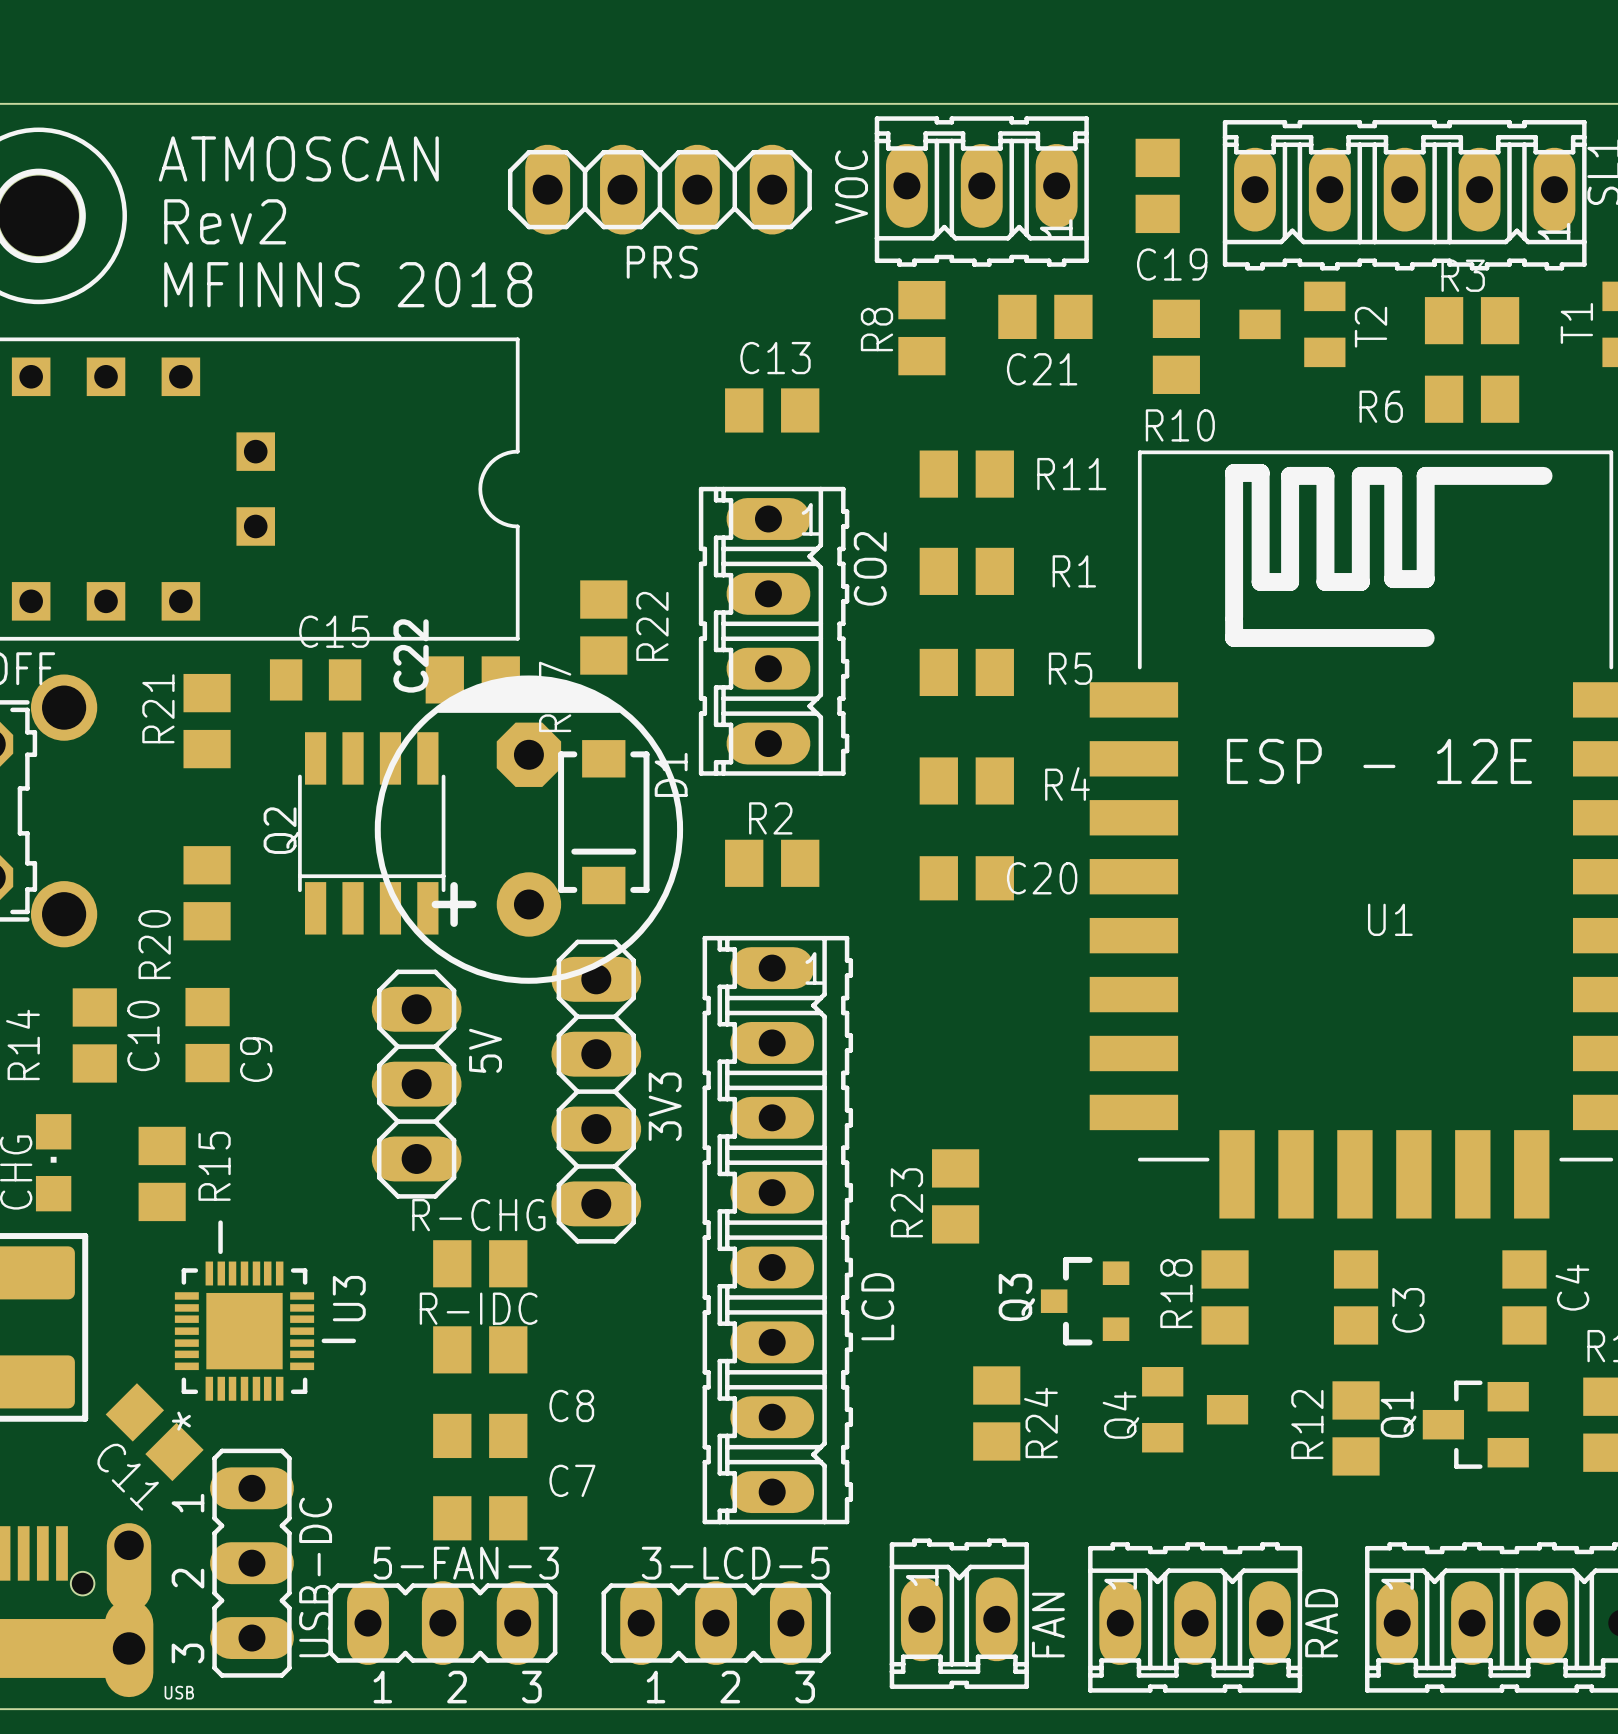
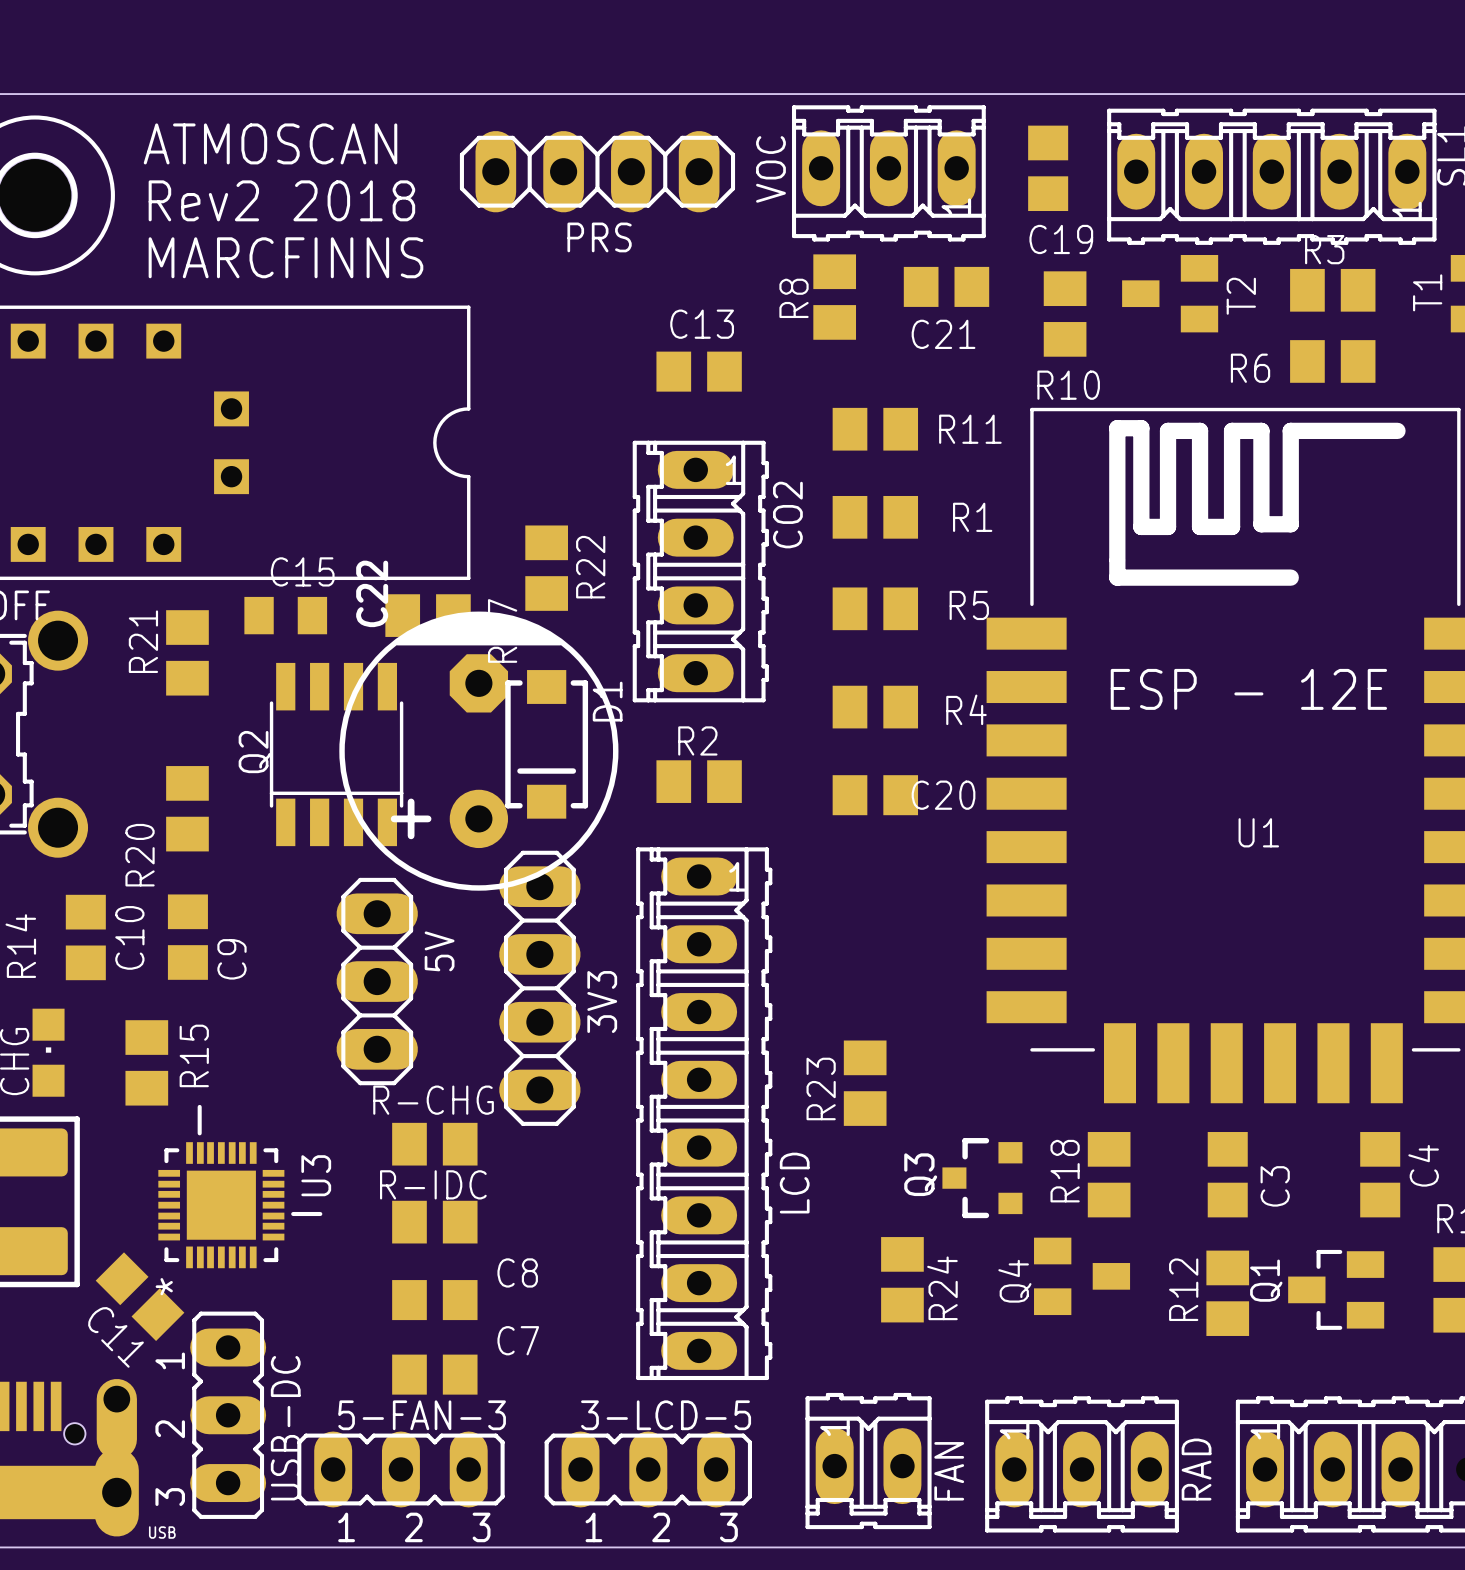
text: Rev2 (225, 221) -> Rev2 2018 (281, 200)
text: MFINNS 2018 (348, 284) -> MARCFINNS (285, 257)

